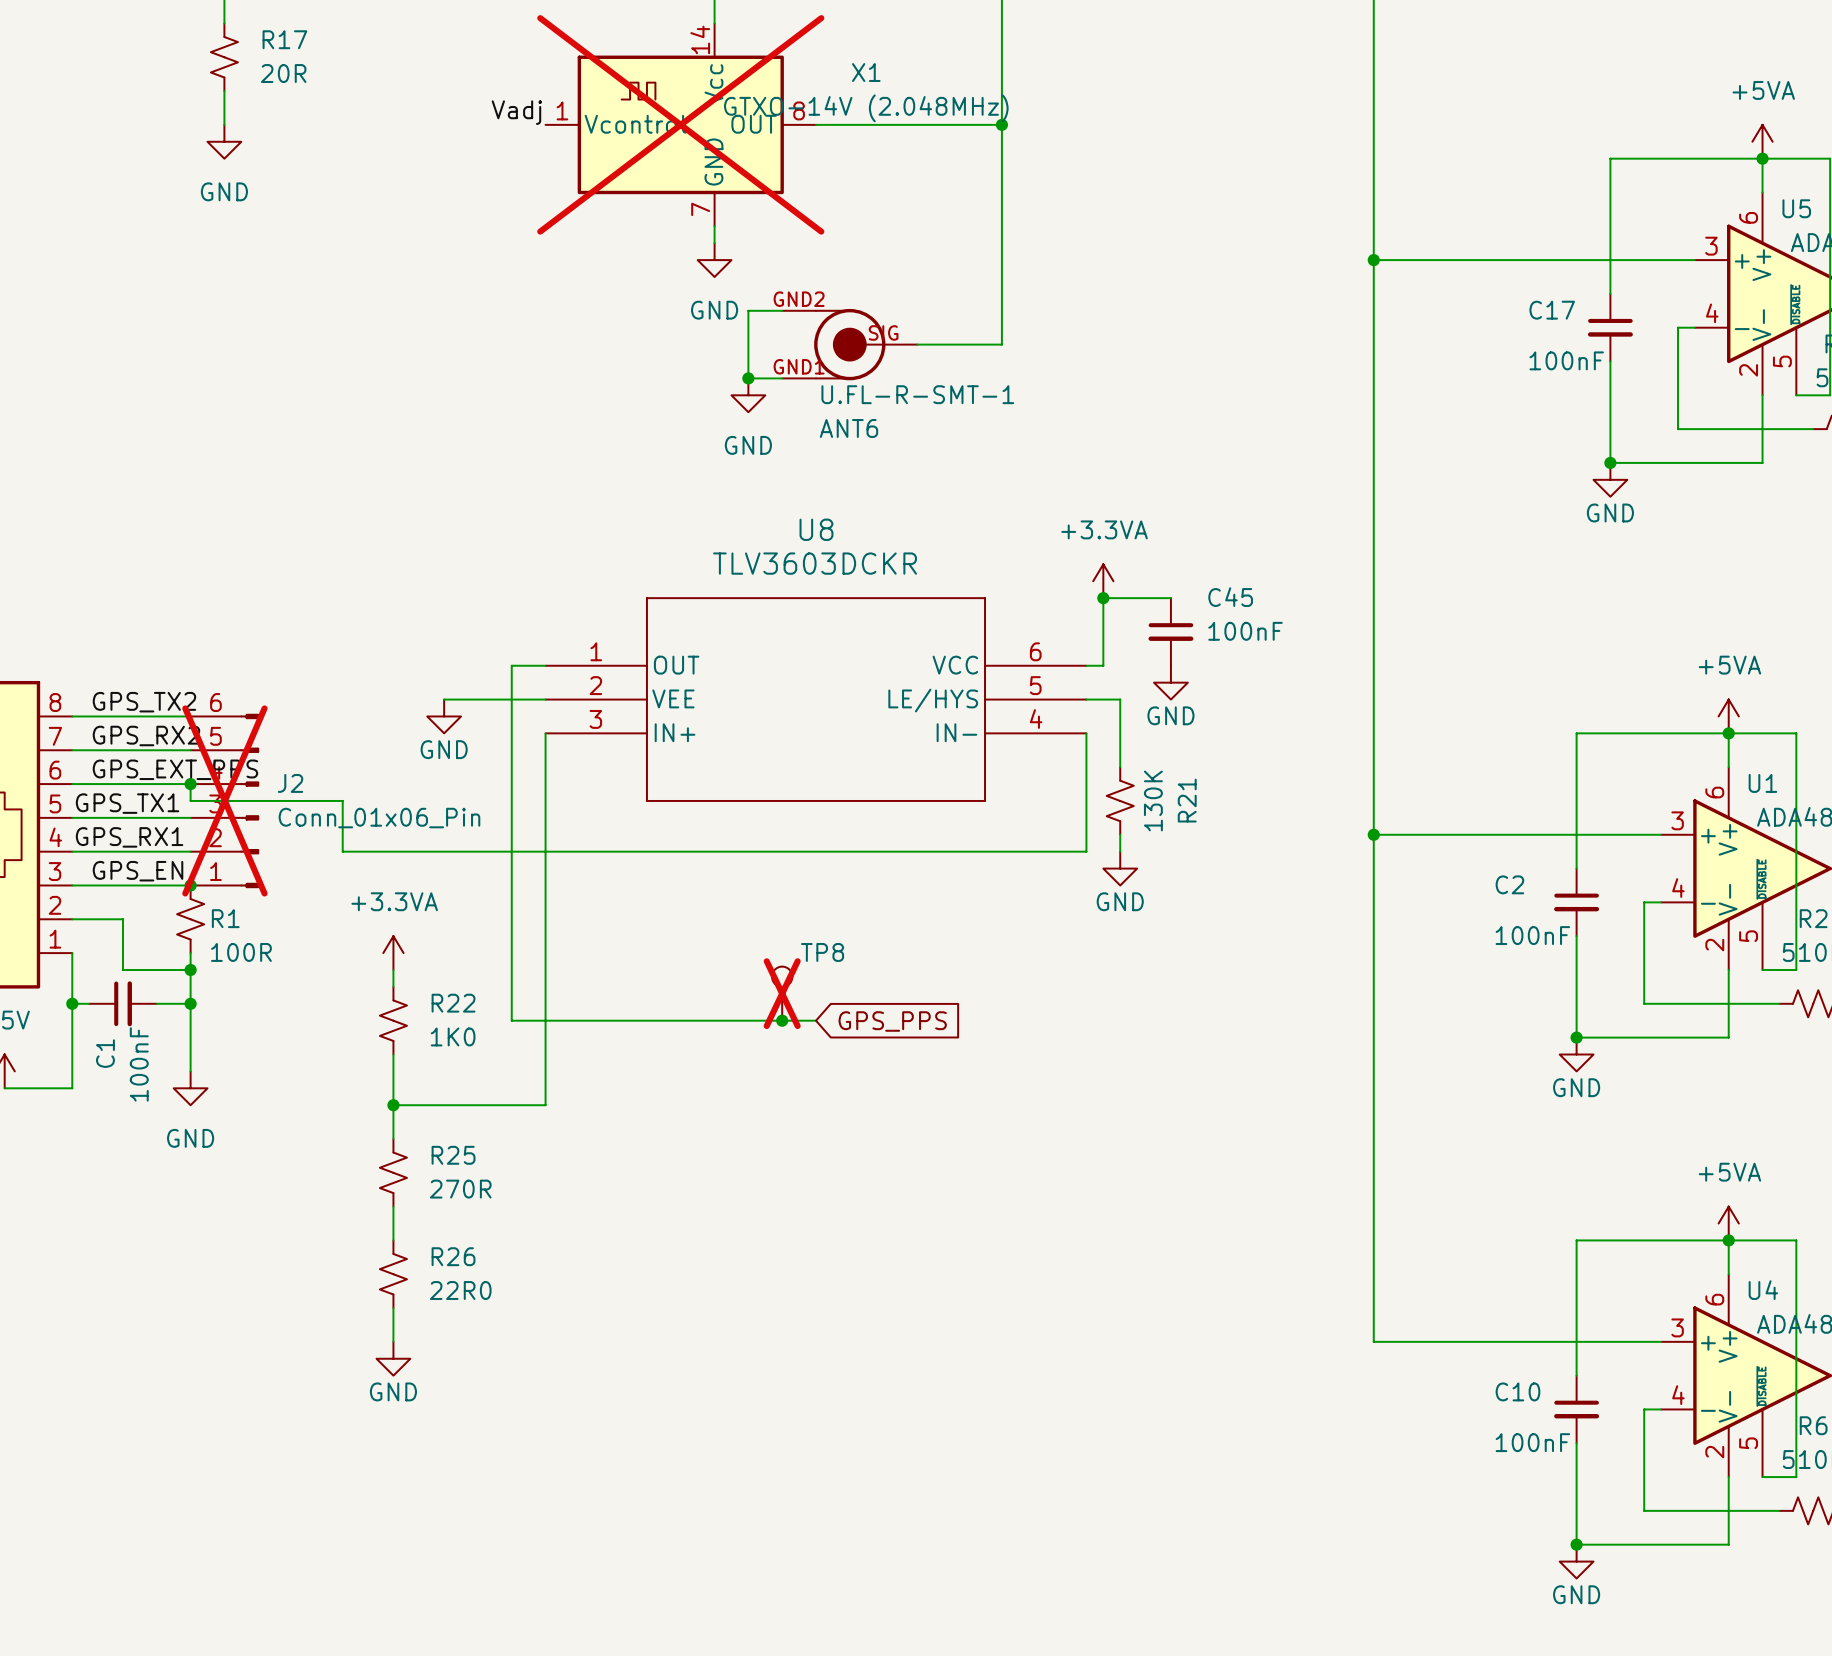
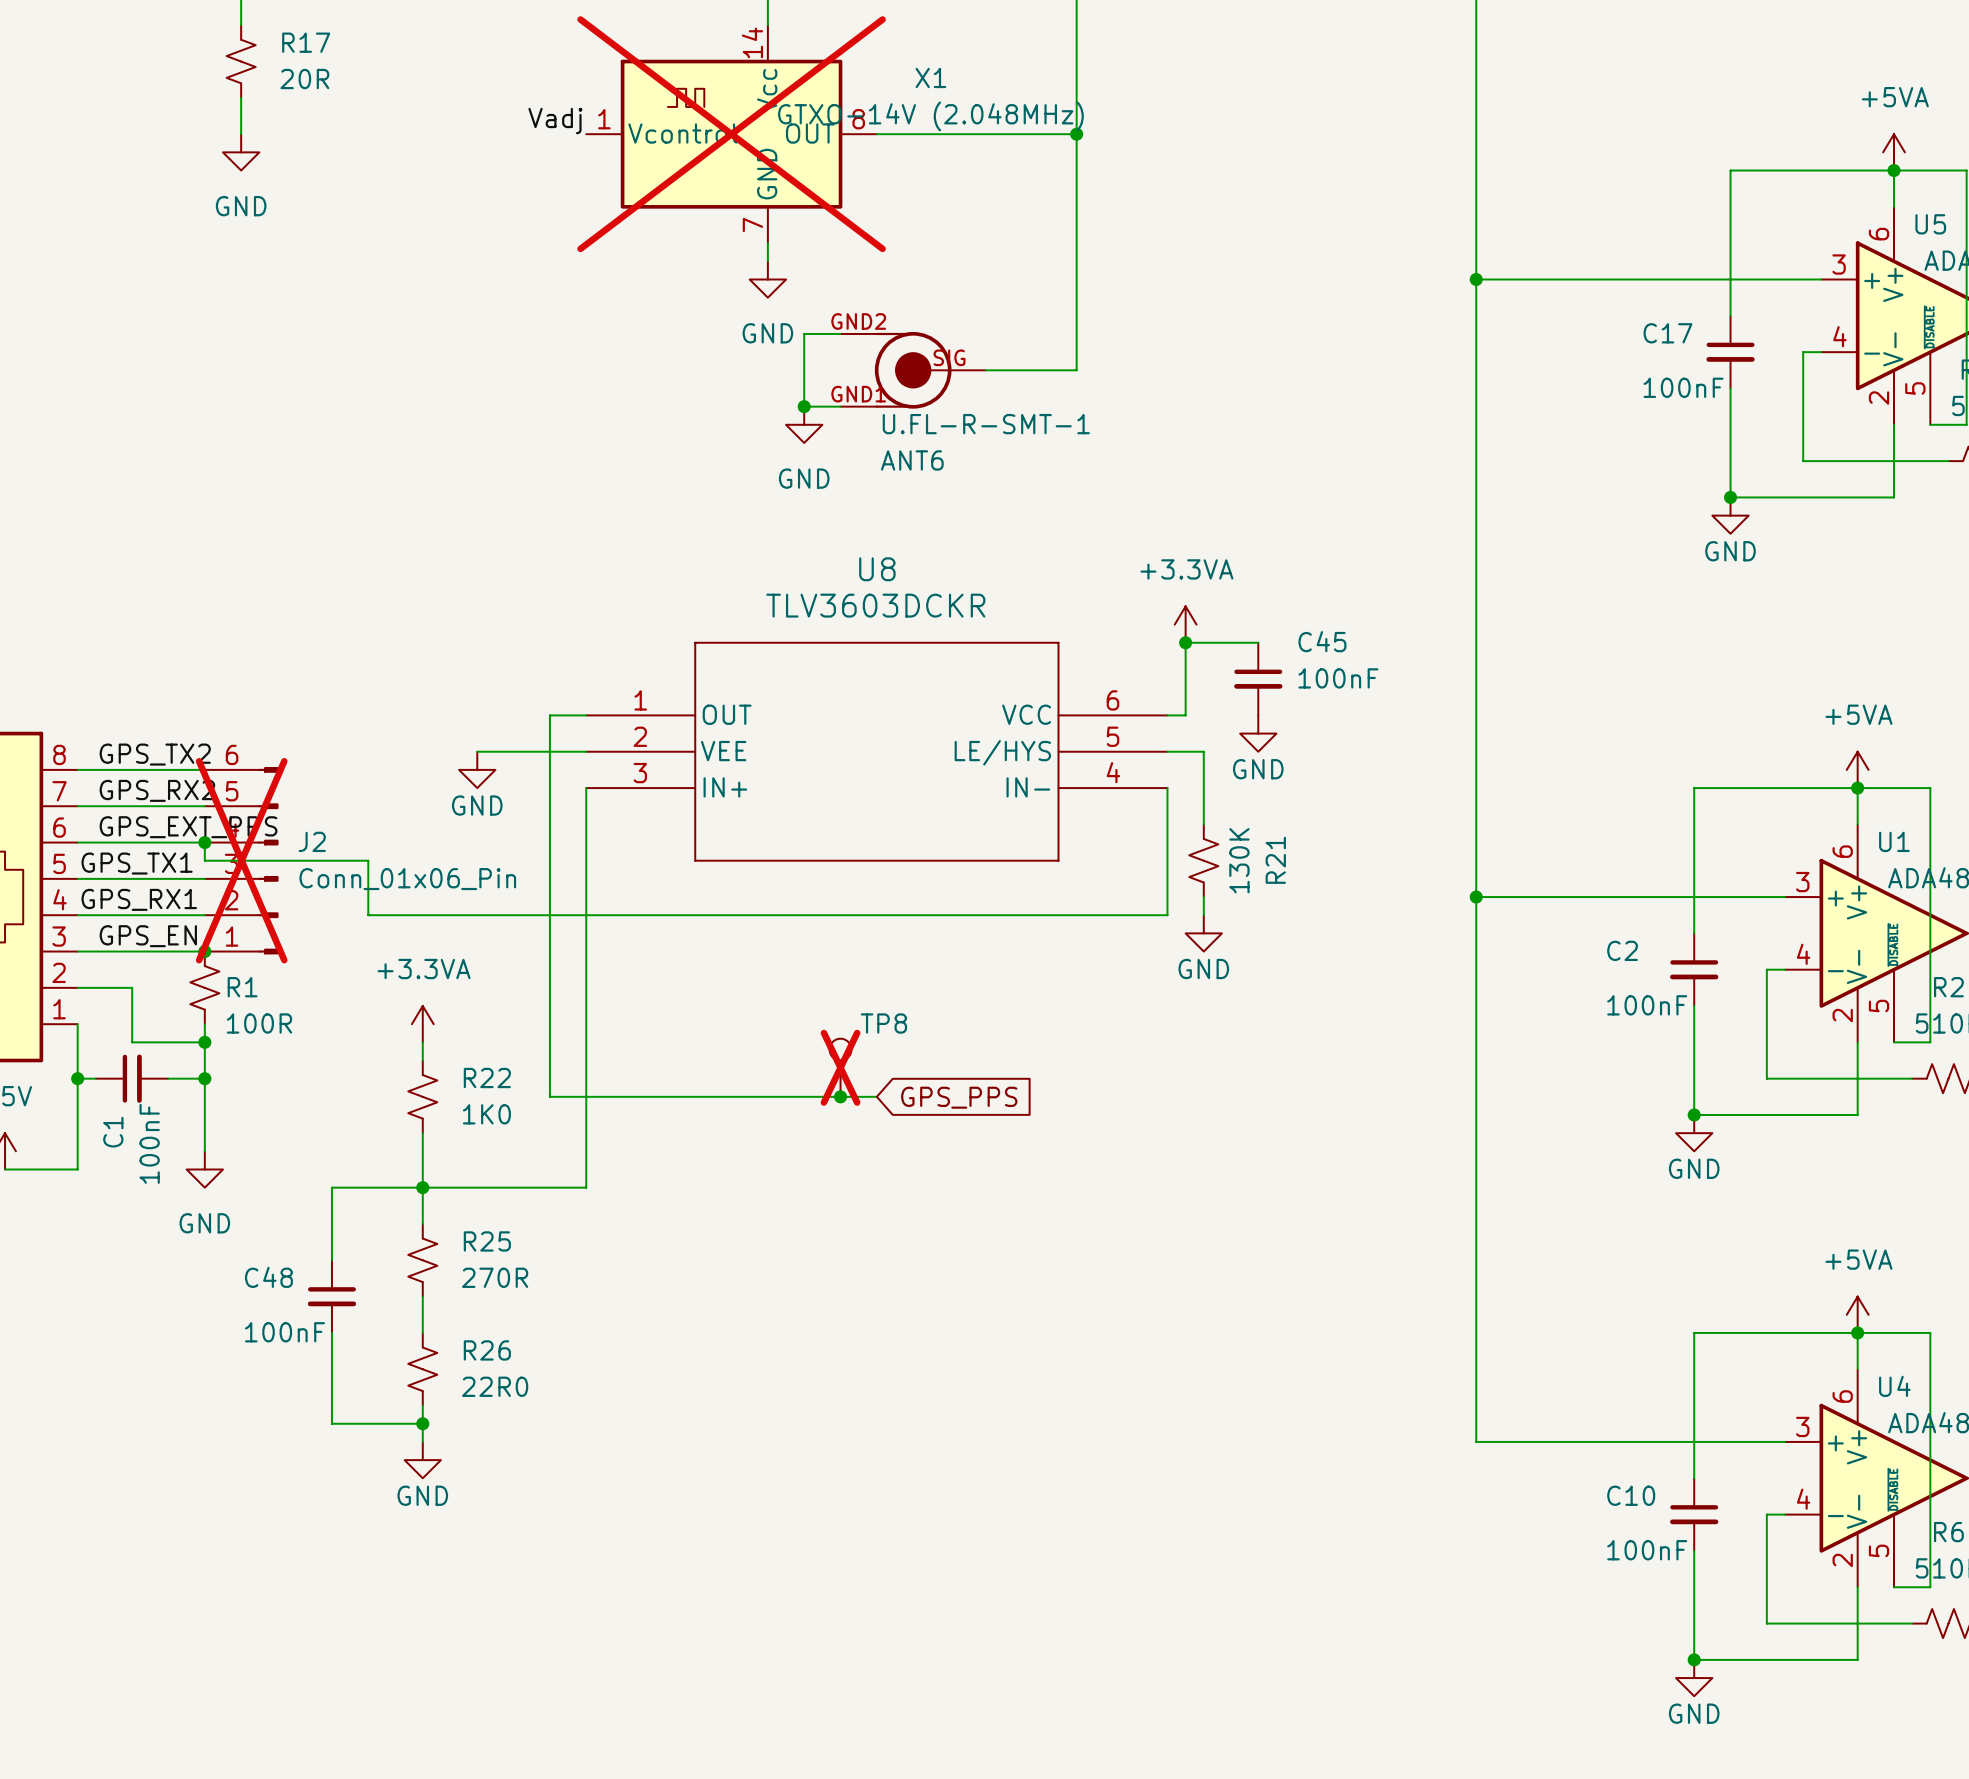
wire: none -> (422, 1187) (331, 1187) (331, 1260)
C48: none -> 100nF (331, 1296)
wire: none -> (331, 1332) (331, 1423) (422, 1423)
junction: none -> (422, 1423)

